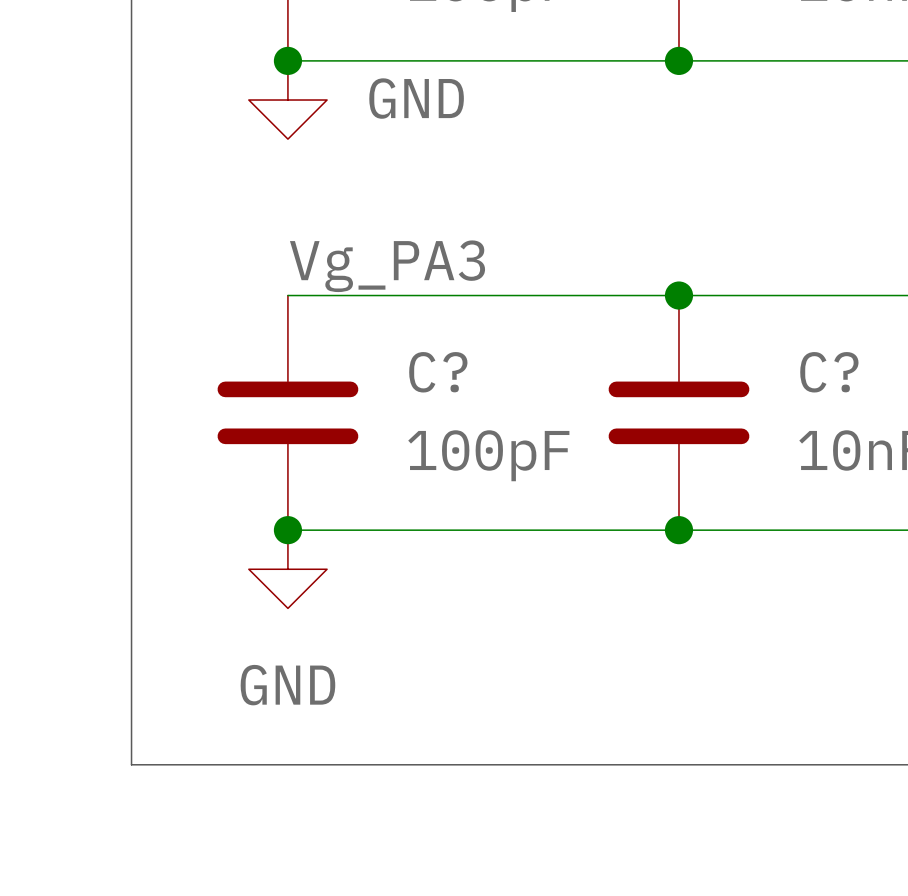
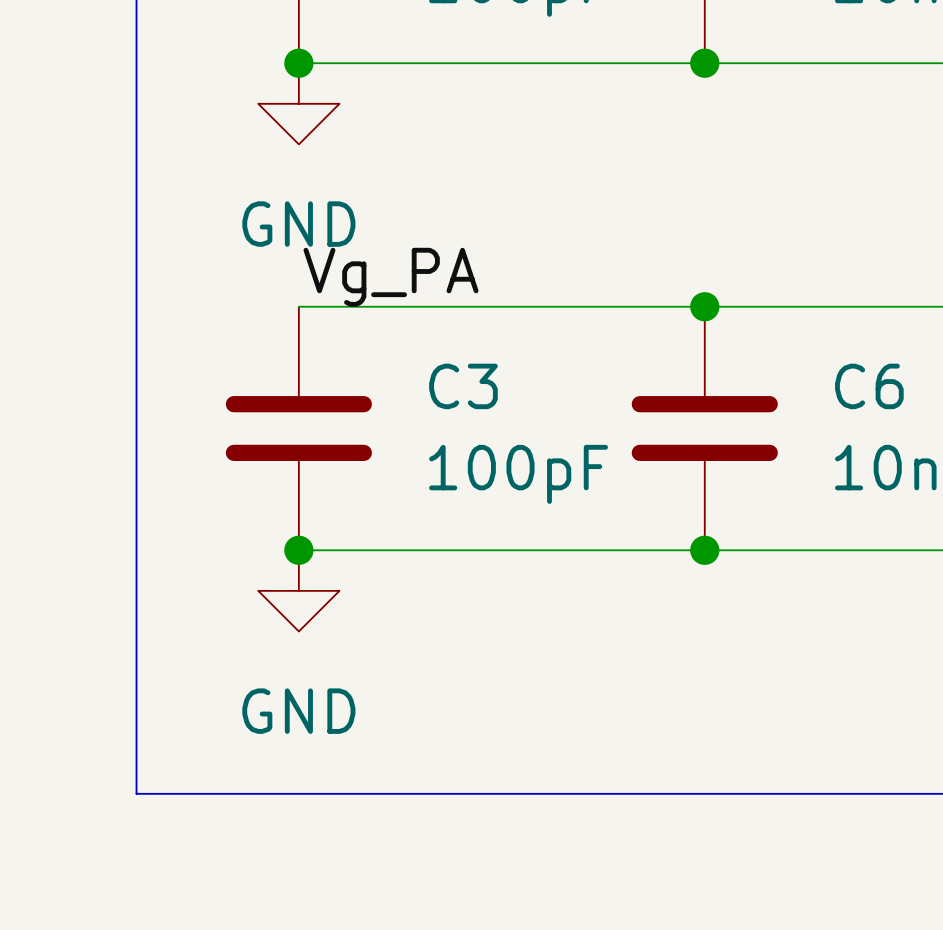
power symbol text position: GND (416, 98) -> GND (298, 224)
label: Vg_PA3 (387, 266) -> Vg_PA (391, 277)
C? name: C? (438, 372) -> C3 (463, 386)
C? name: C? (829, 372) -> C6 (869, 386)

